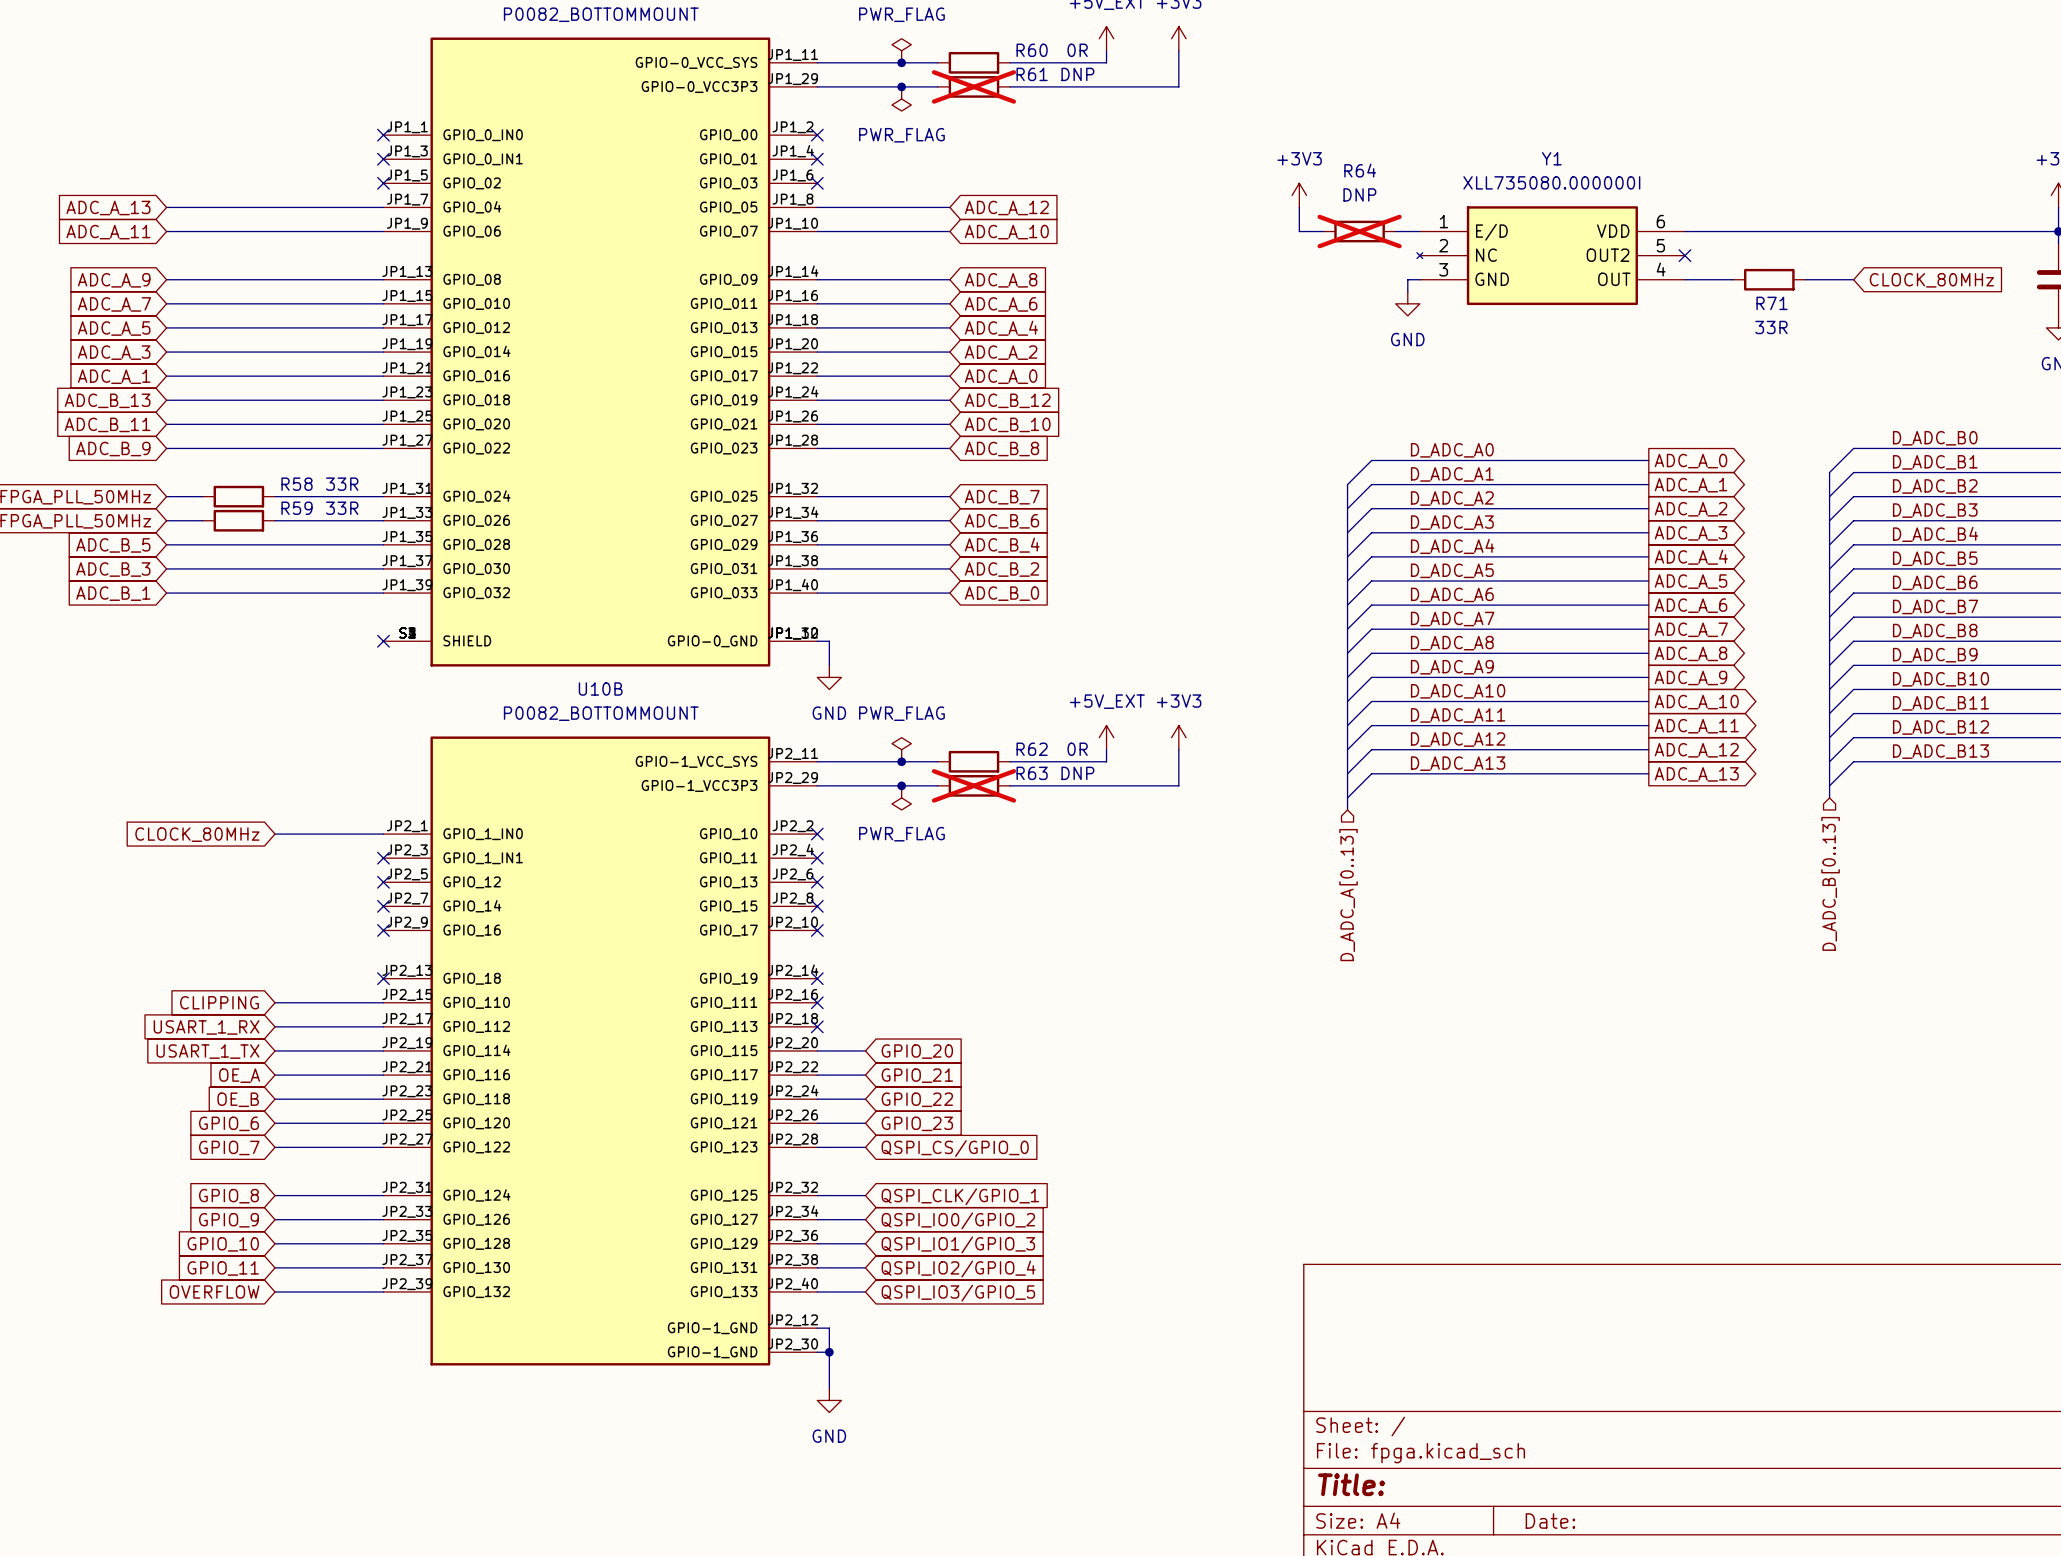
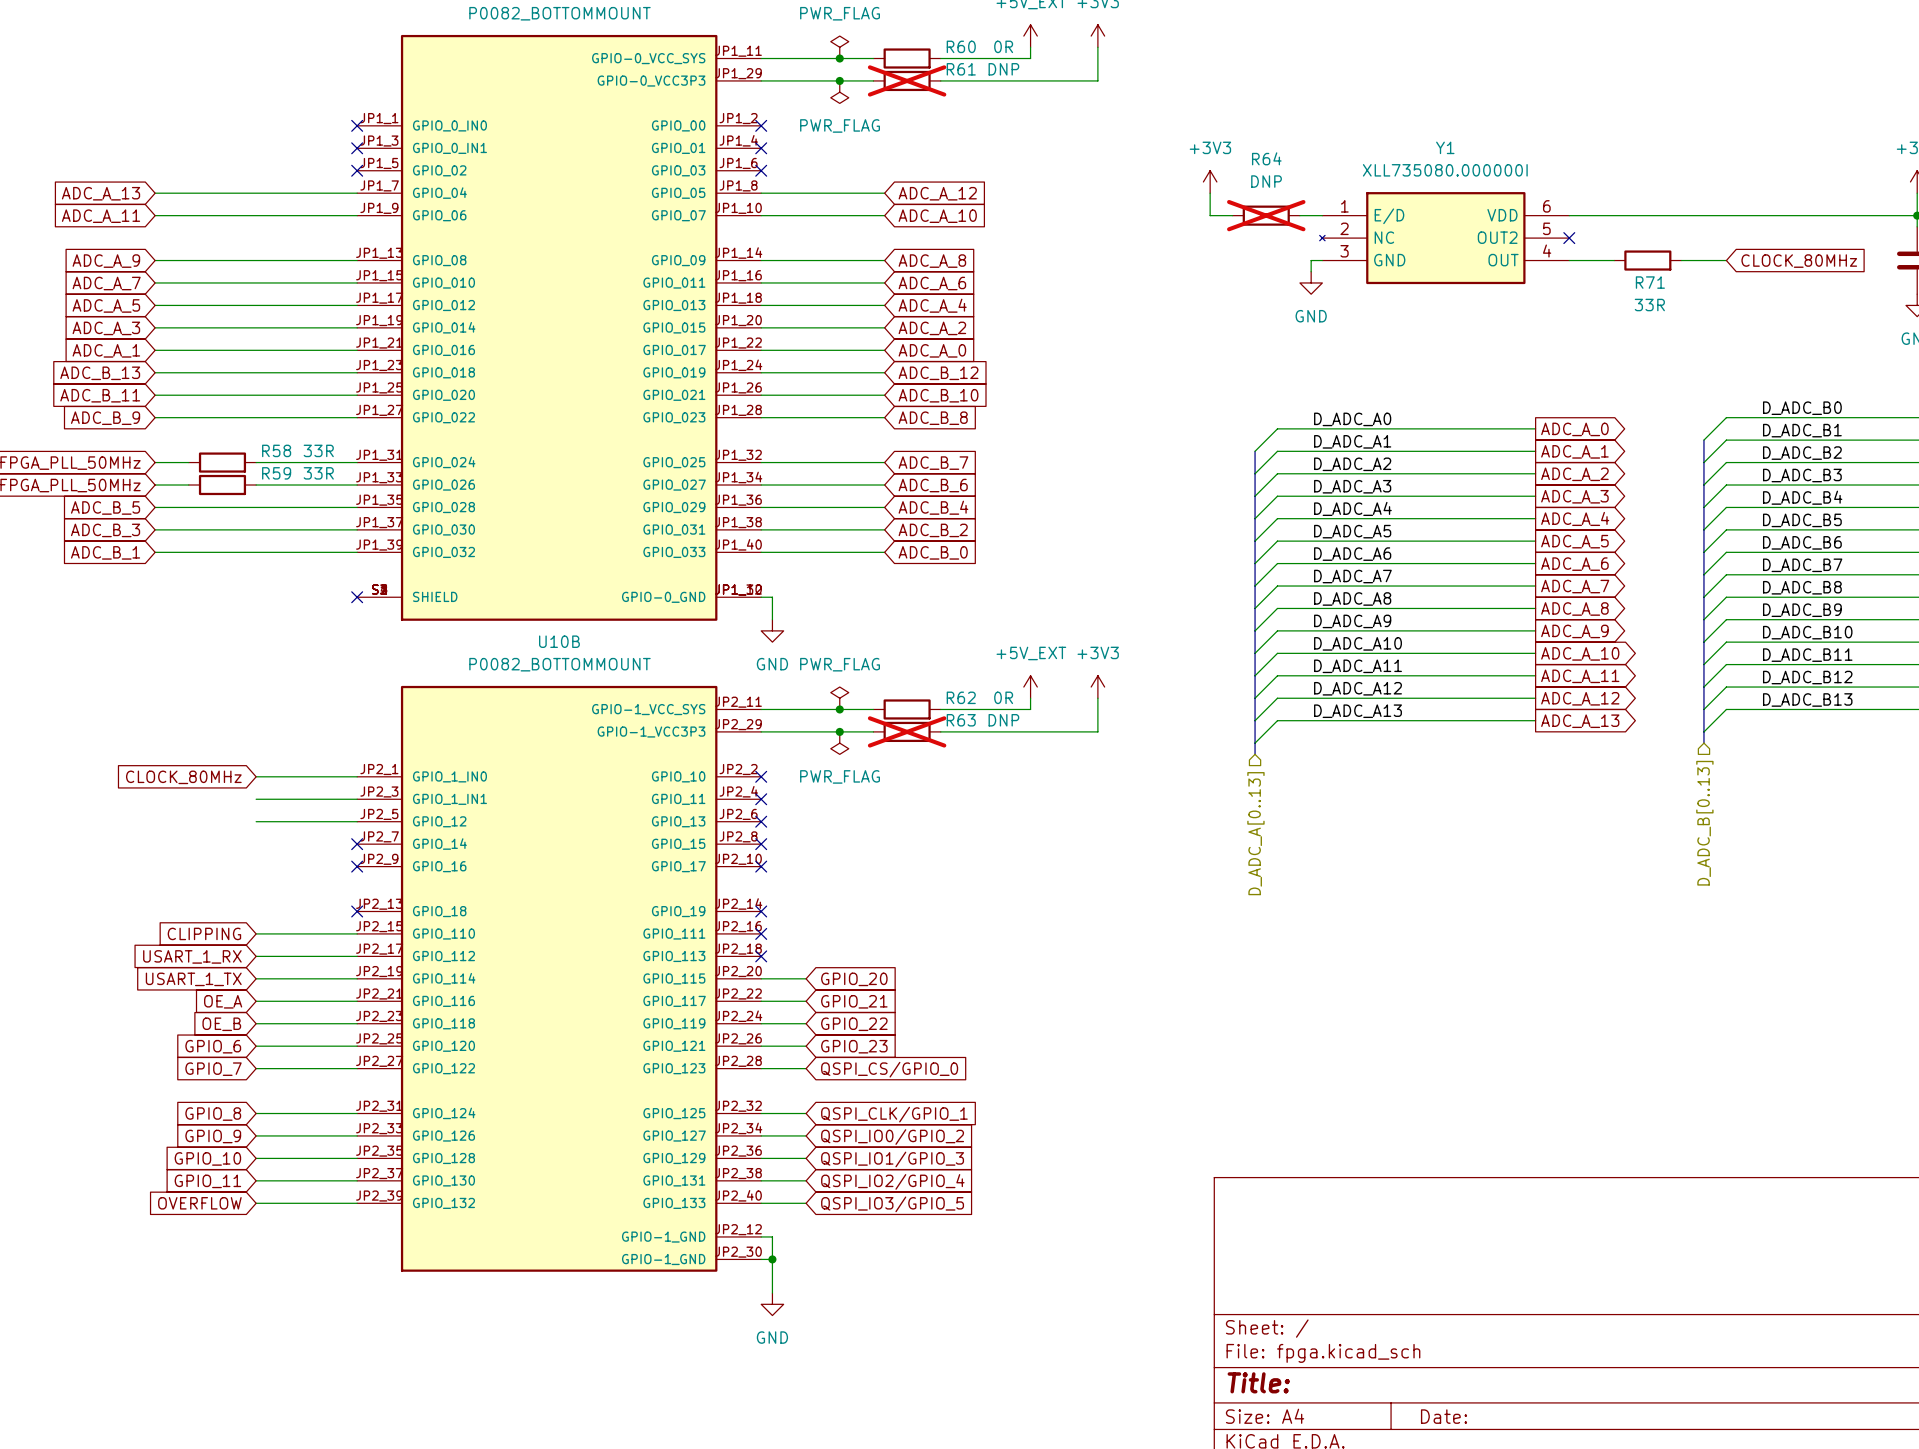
wire: none -> (256, 799) (357, 799)
no-connect mark: (383, 858) -> none
wire: none -> (256, 821) (357, 821)
no-connect mark: (383, 882) -> none

